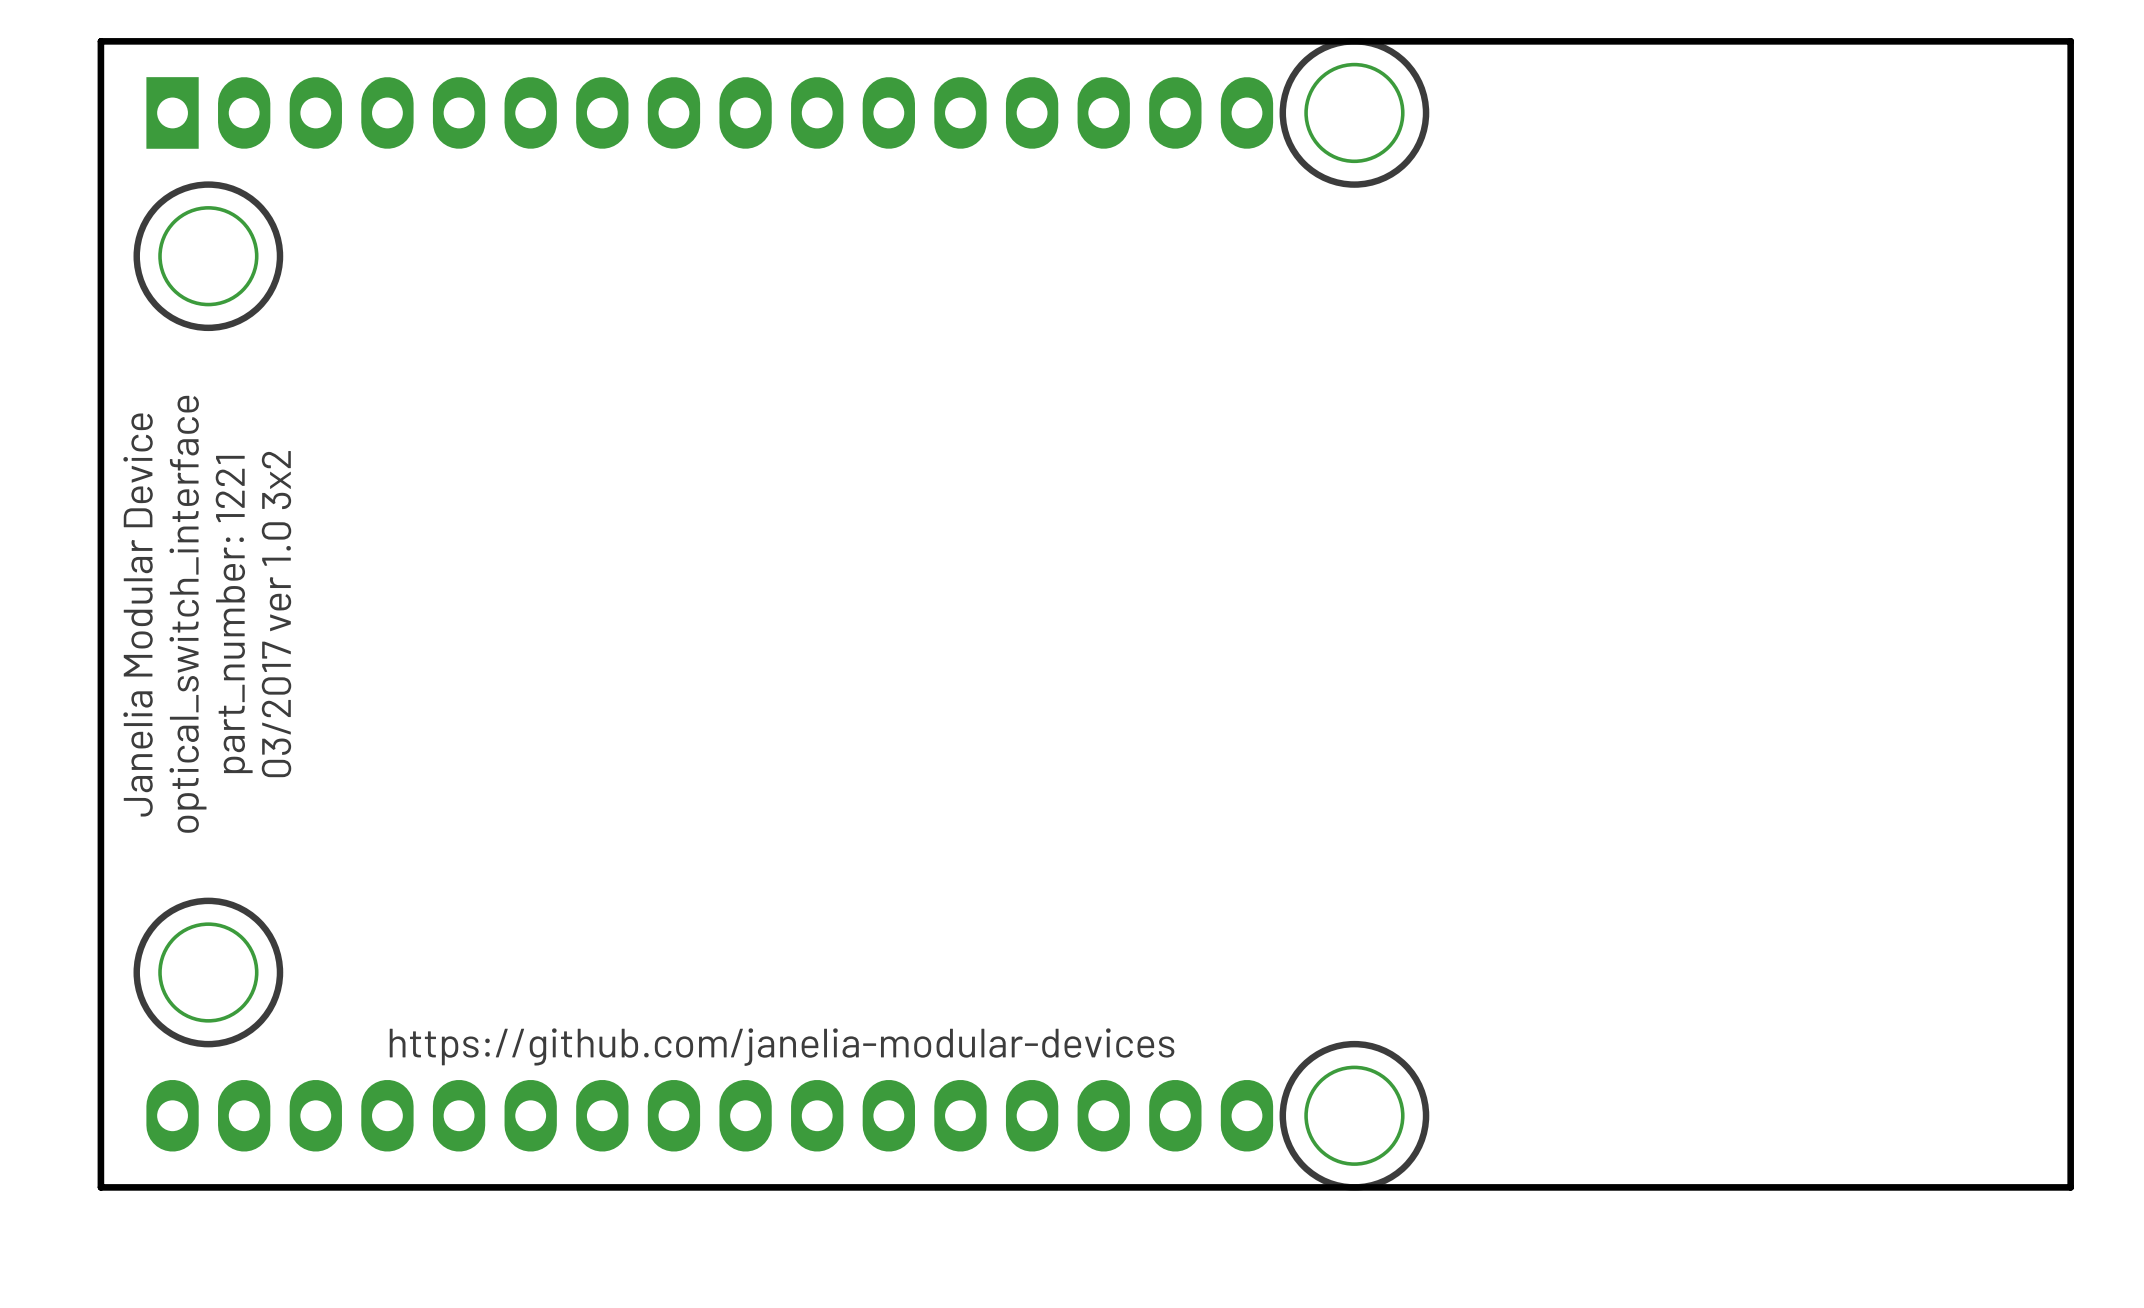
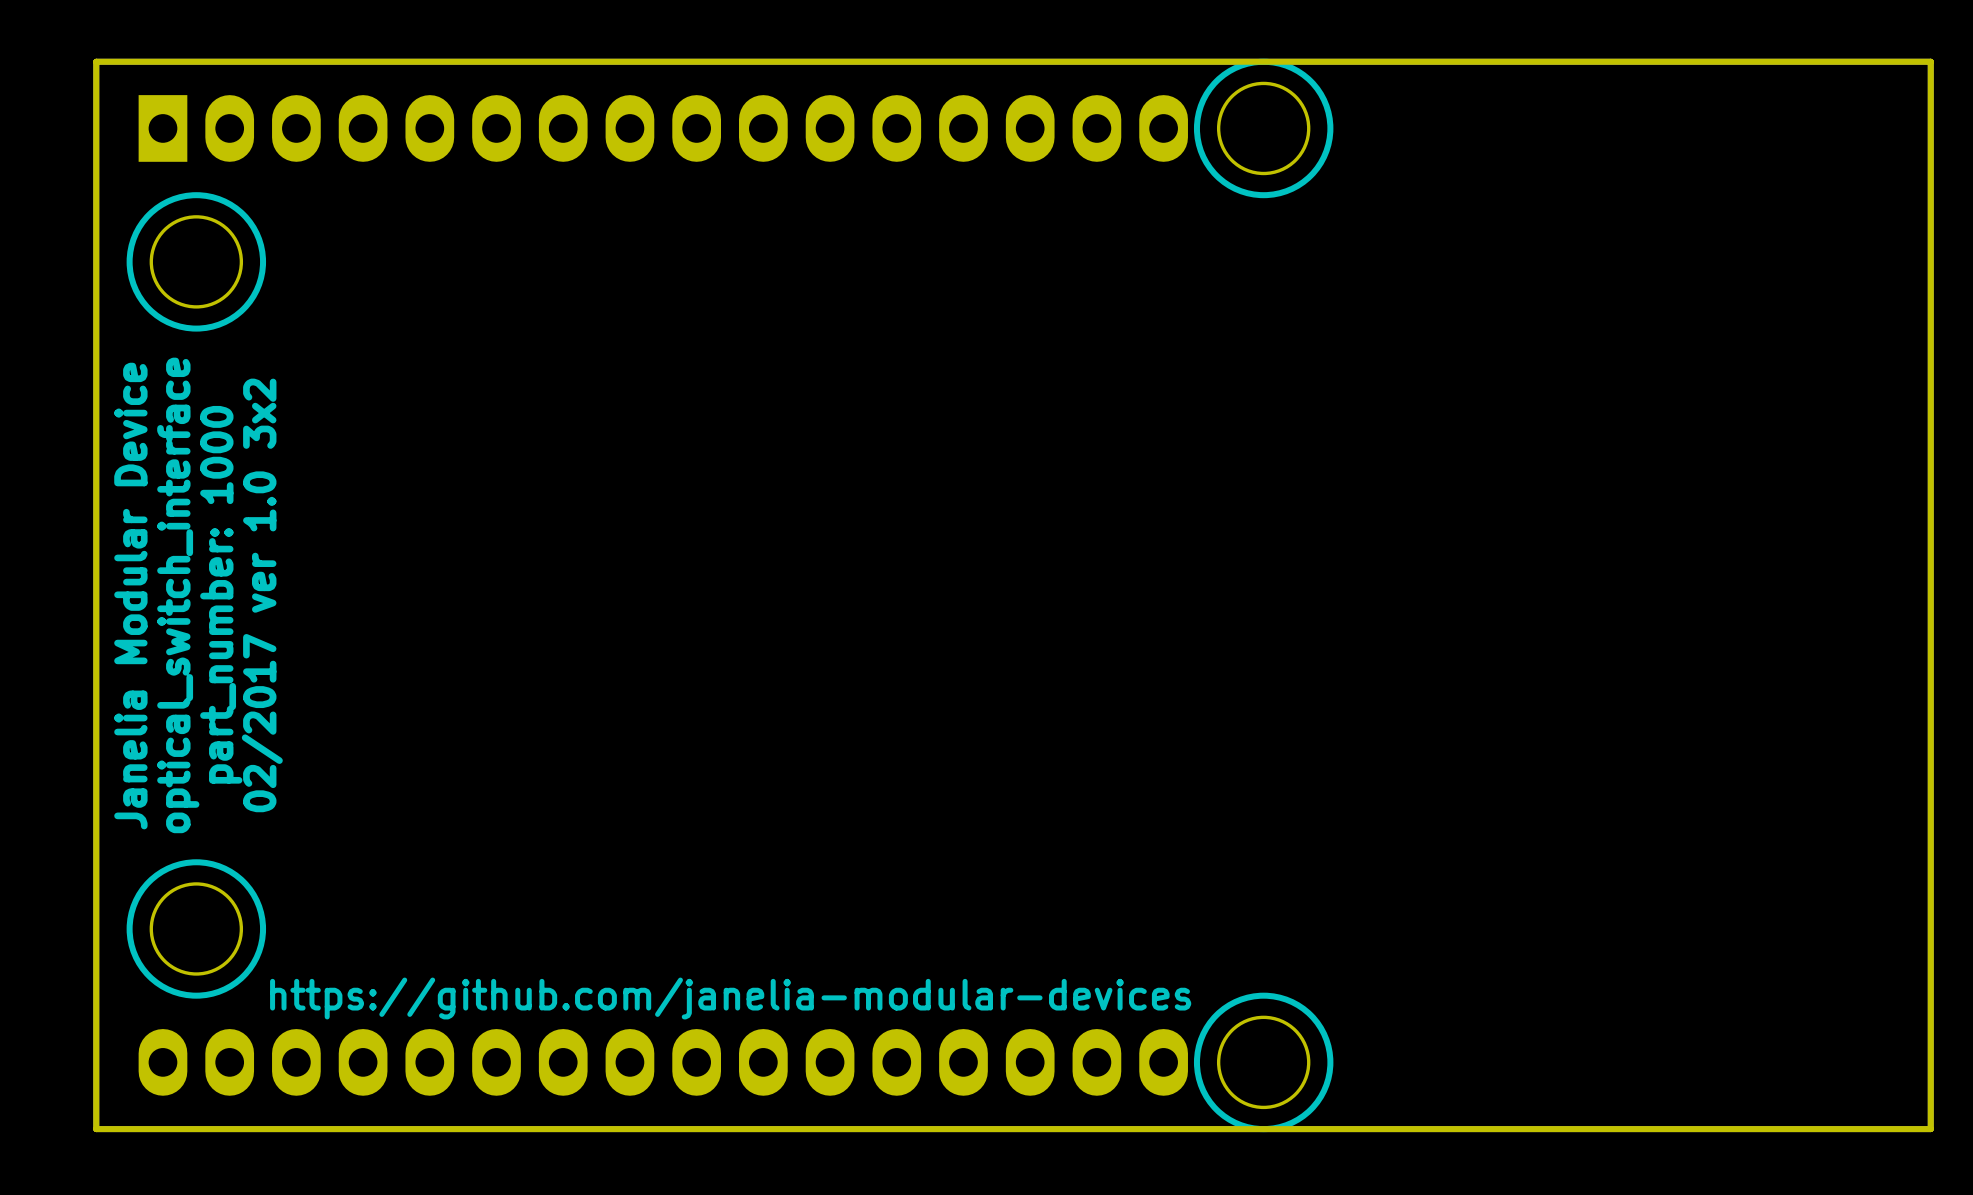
text: part_number: 1221 (234, 614) -> part_number: 1000 (221, 594)
text: 03/2017 ver 1.0 3x2 (276, 614) -> 02/2017 ver 1.0 3x2 (262, 595)

